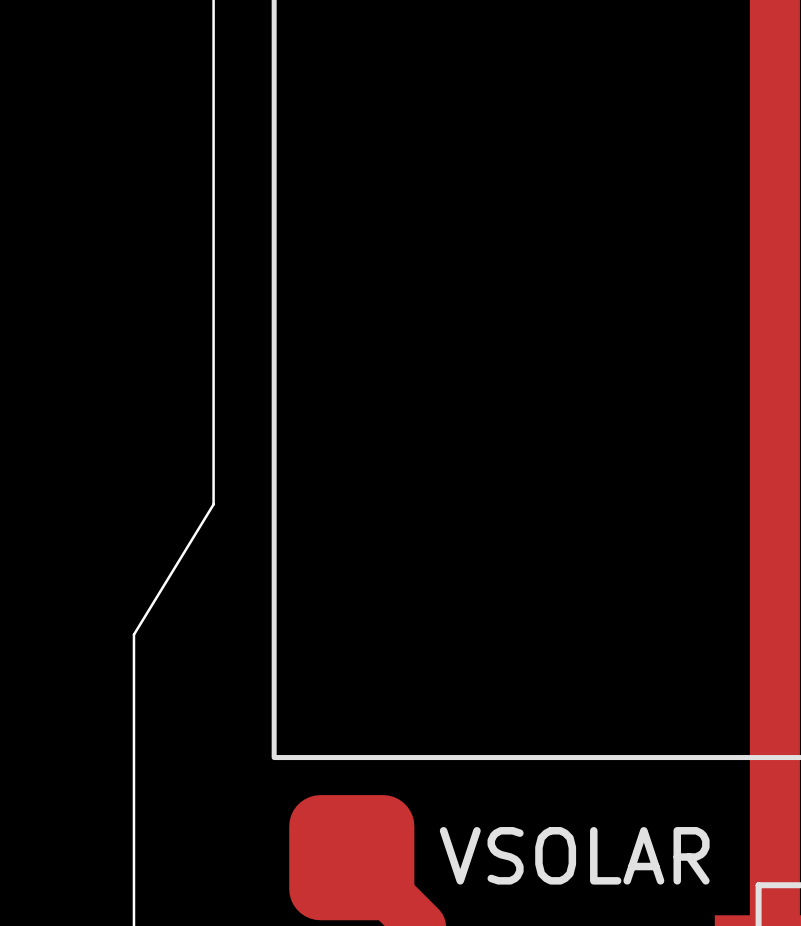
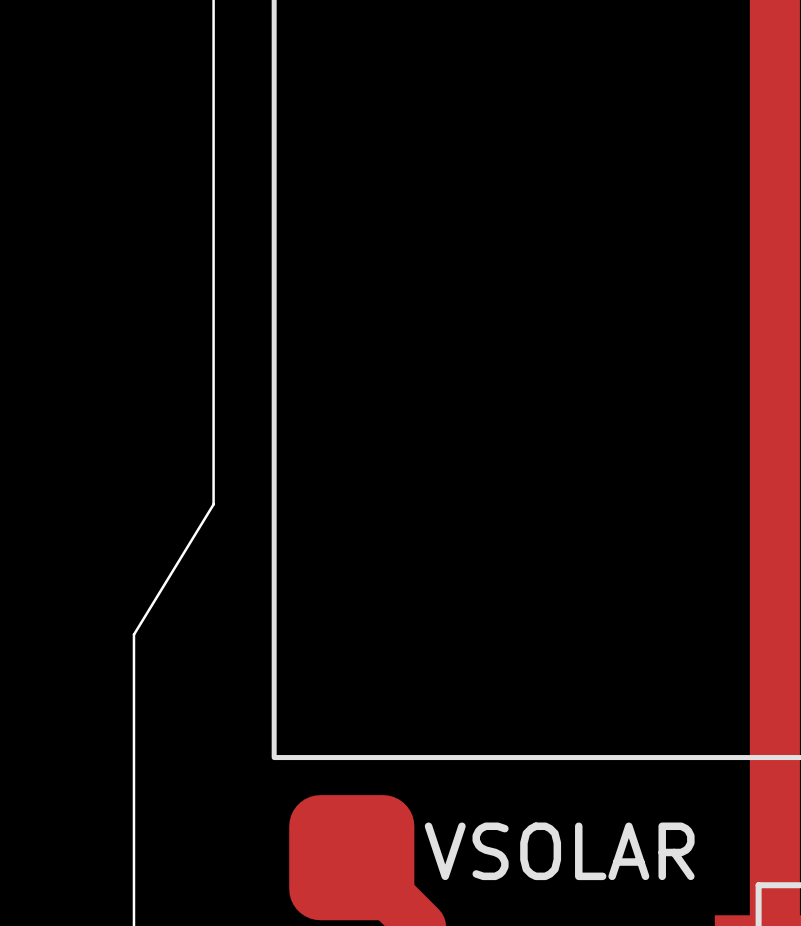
text position: VSOLAR (574, 855) -> VSOLAR (559, 851)

